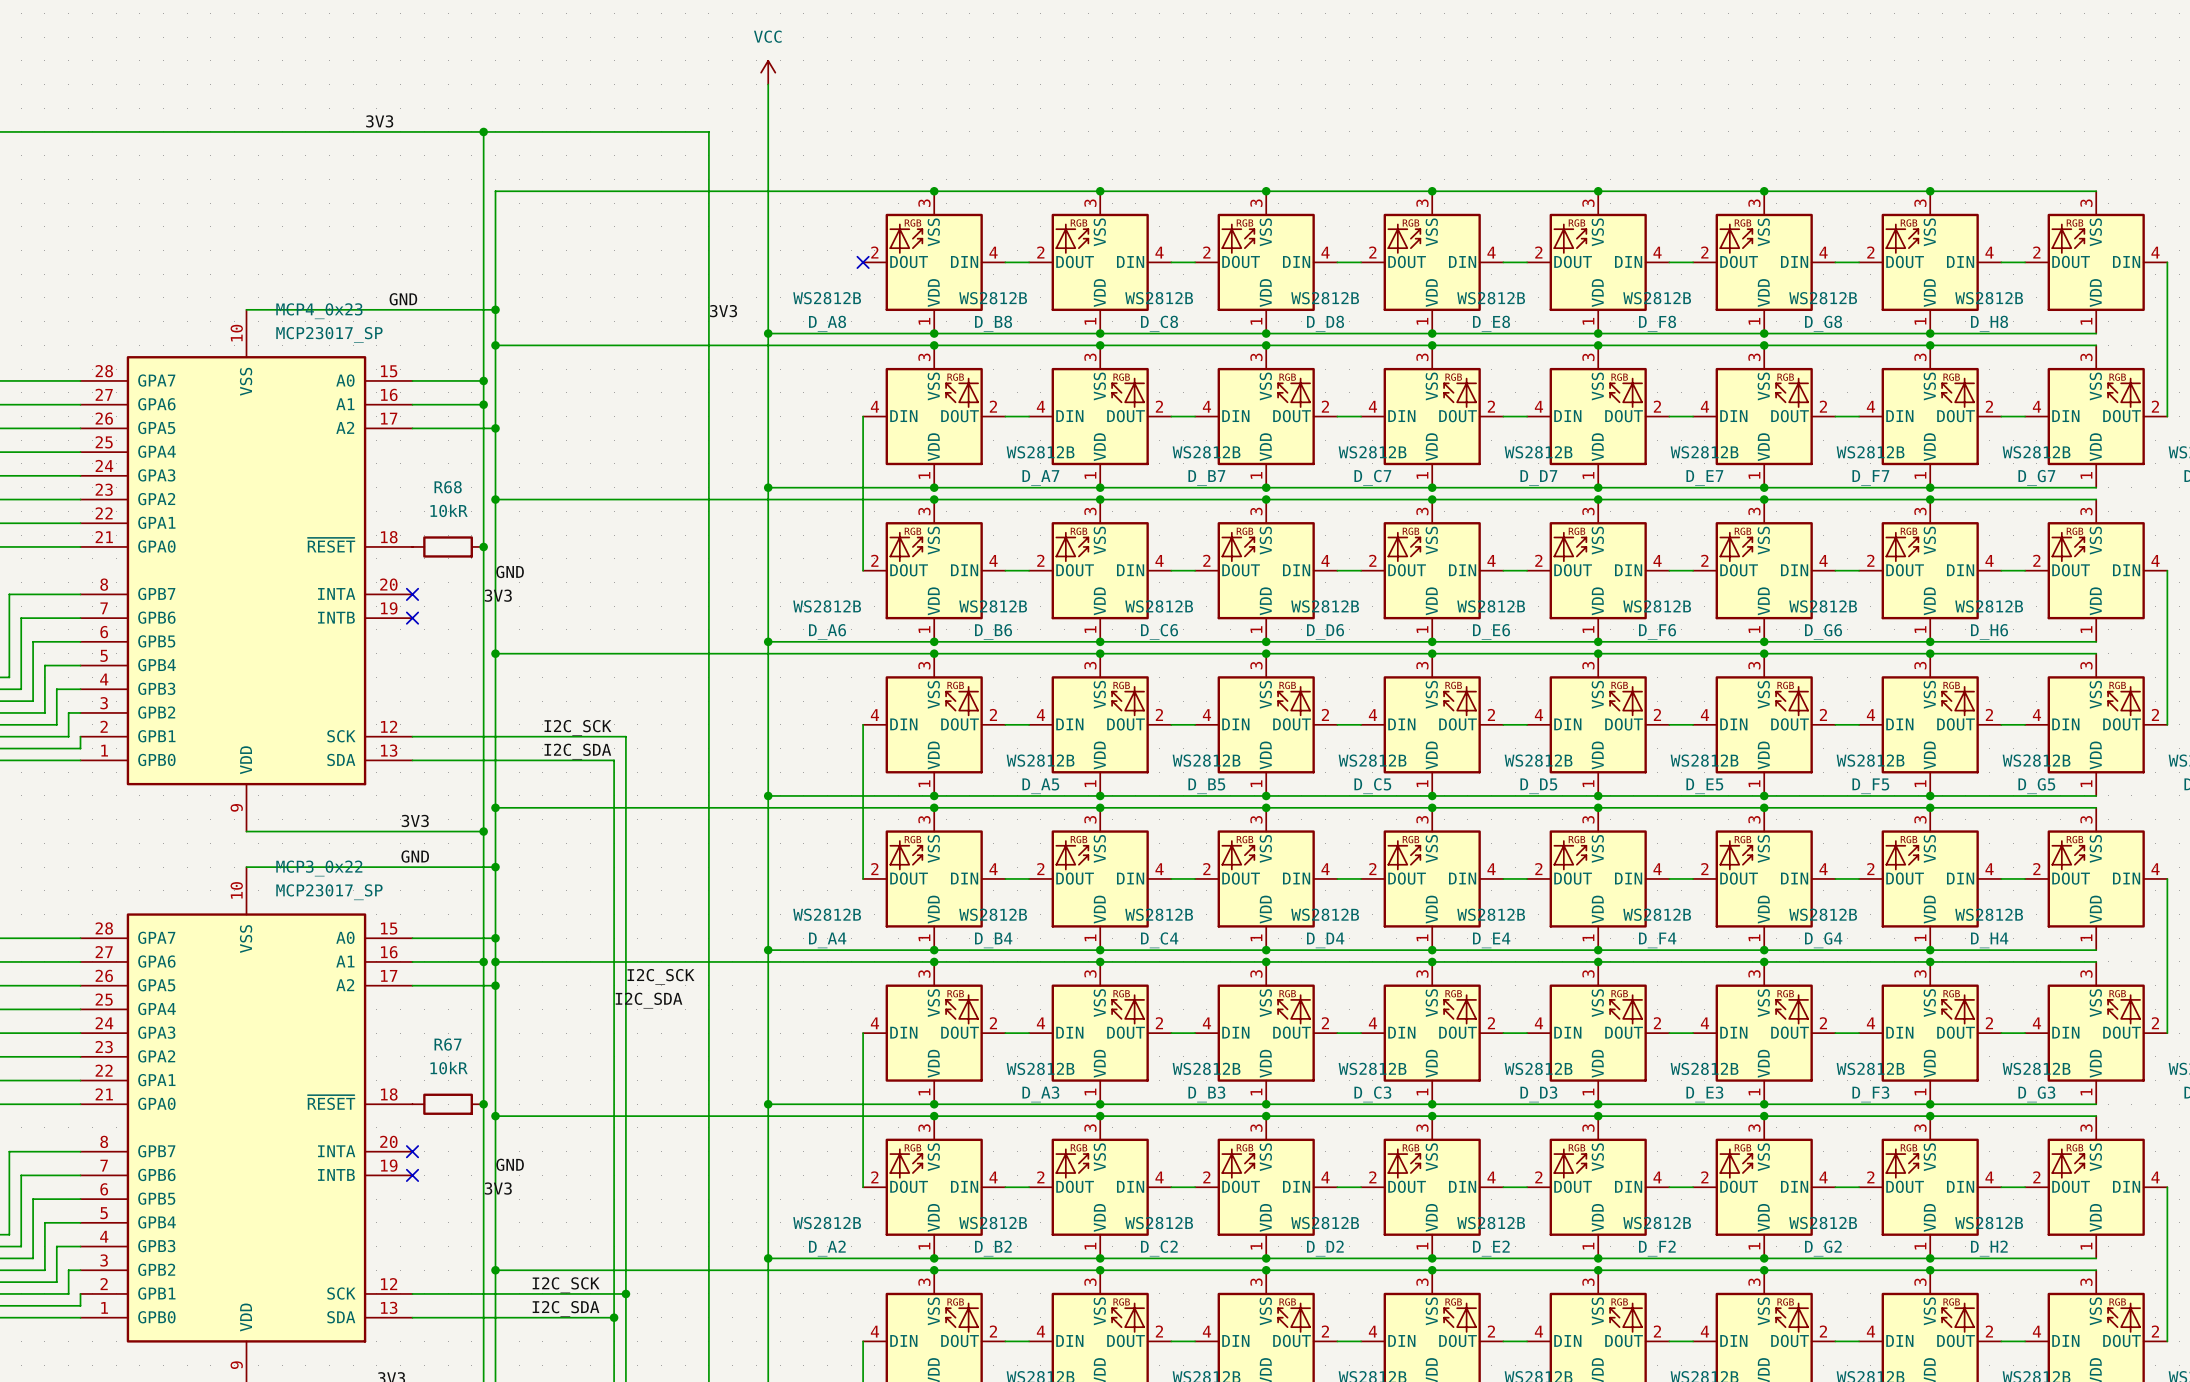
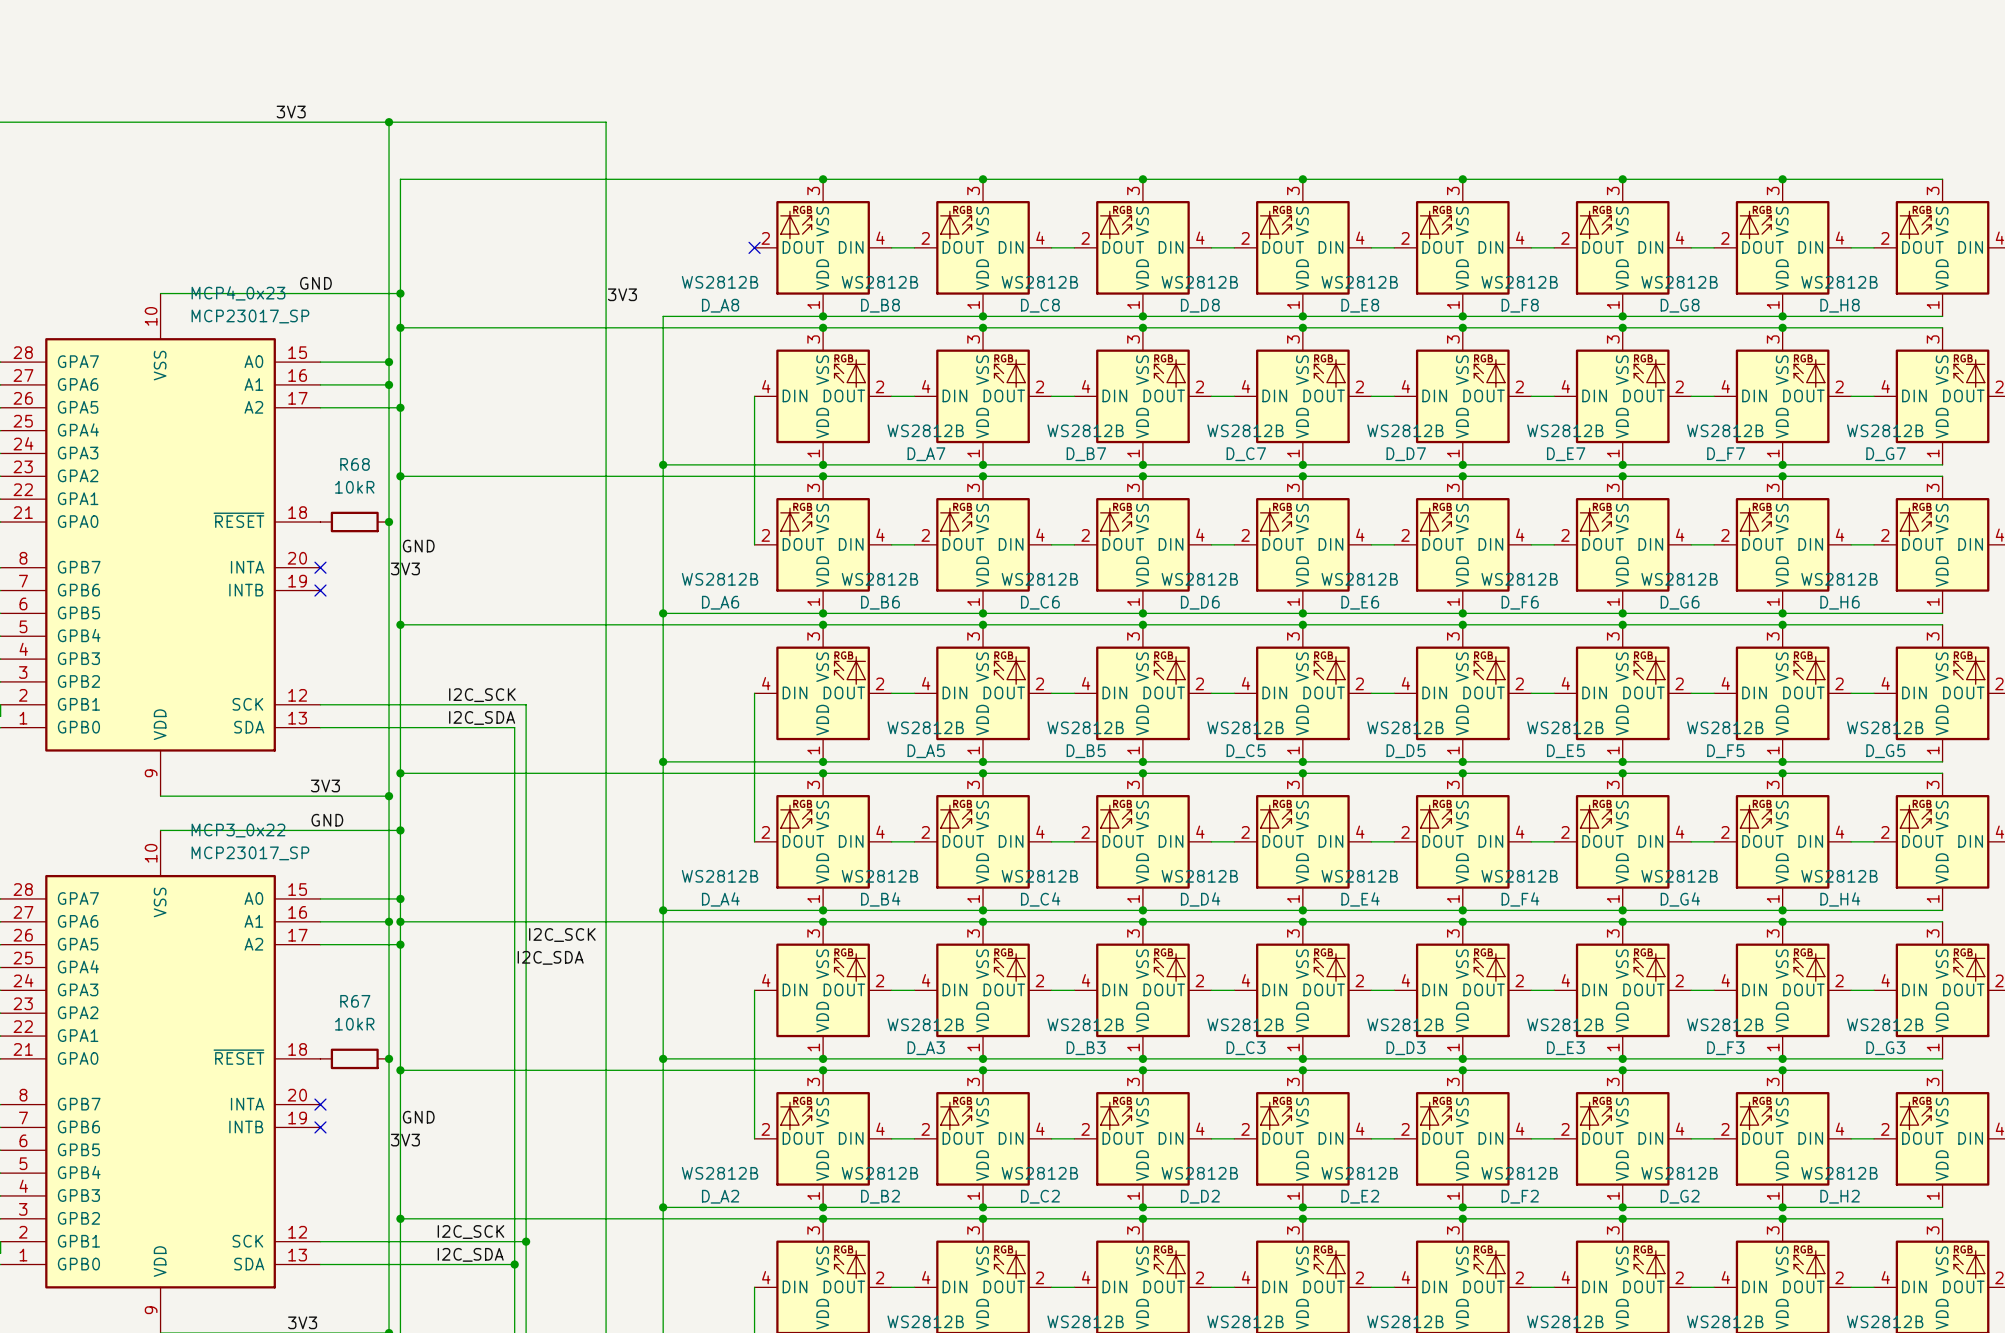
power symbol: VCC (768, 72) -> none
wire: (768, 84) (768, 333) -> none
junction: (768, 333) -> none

